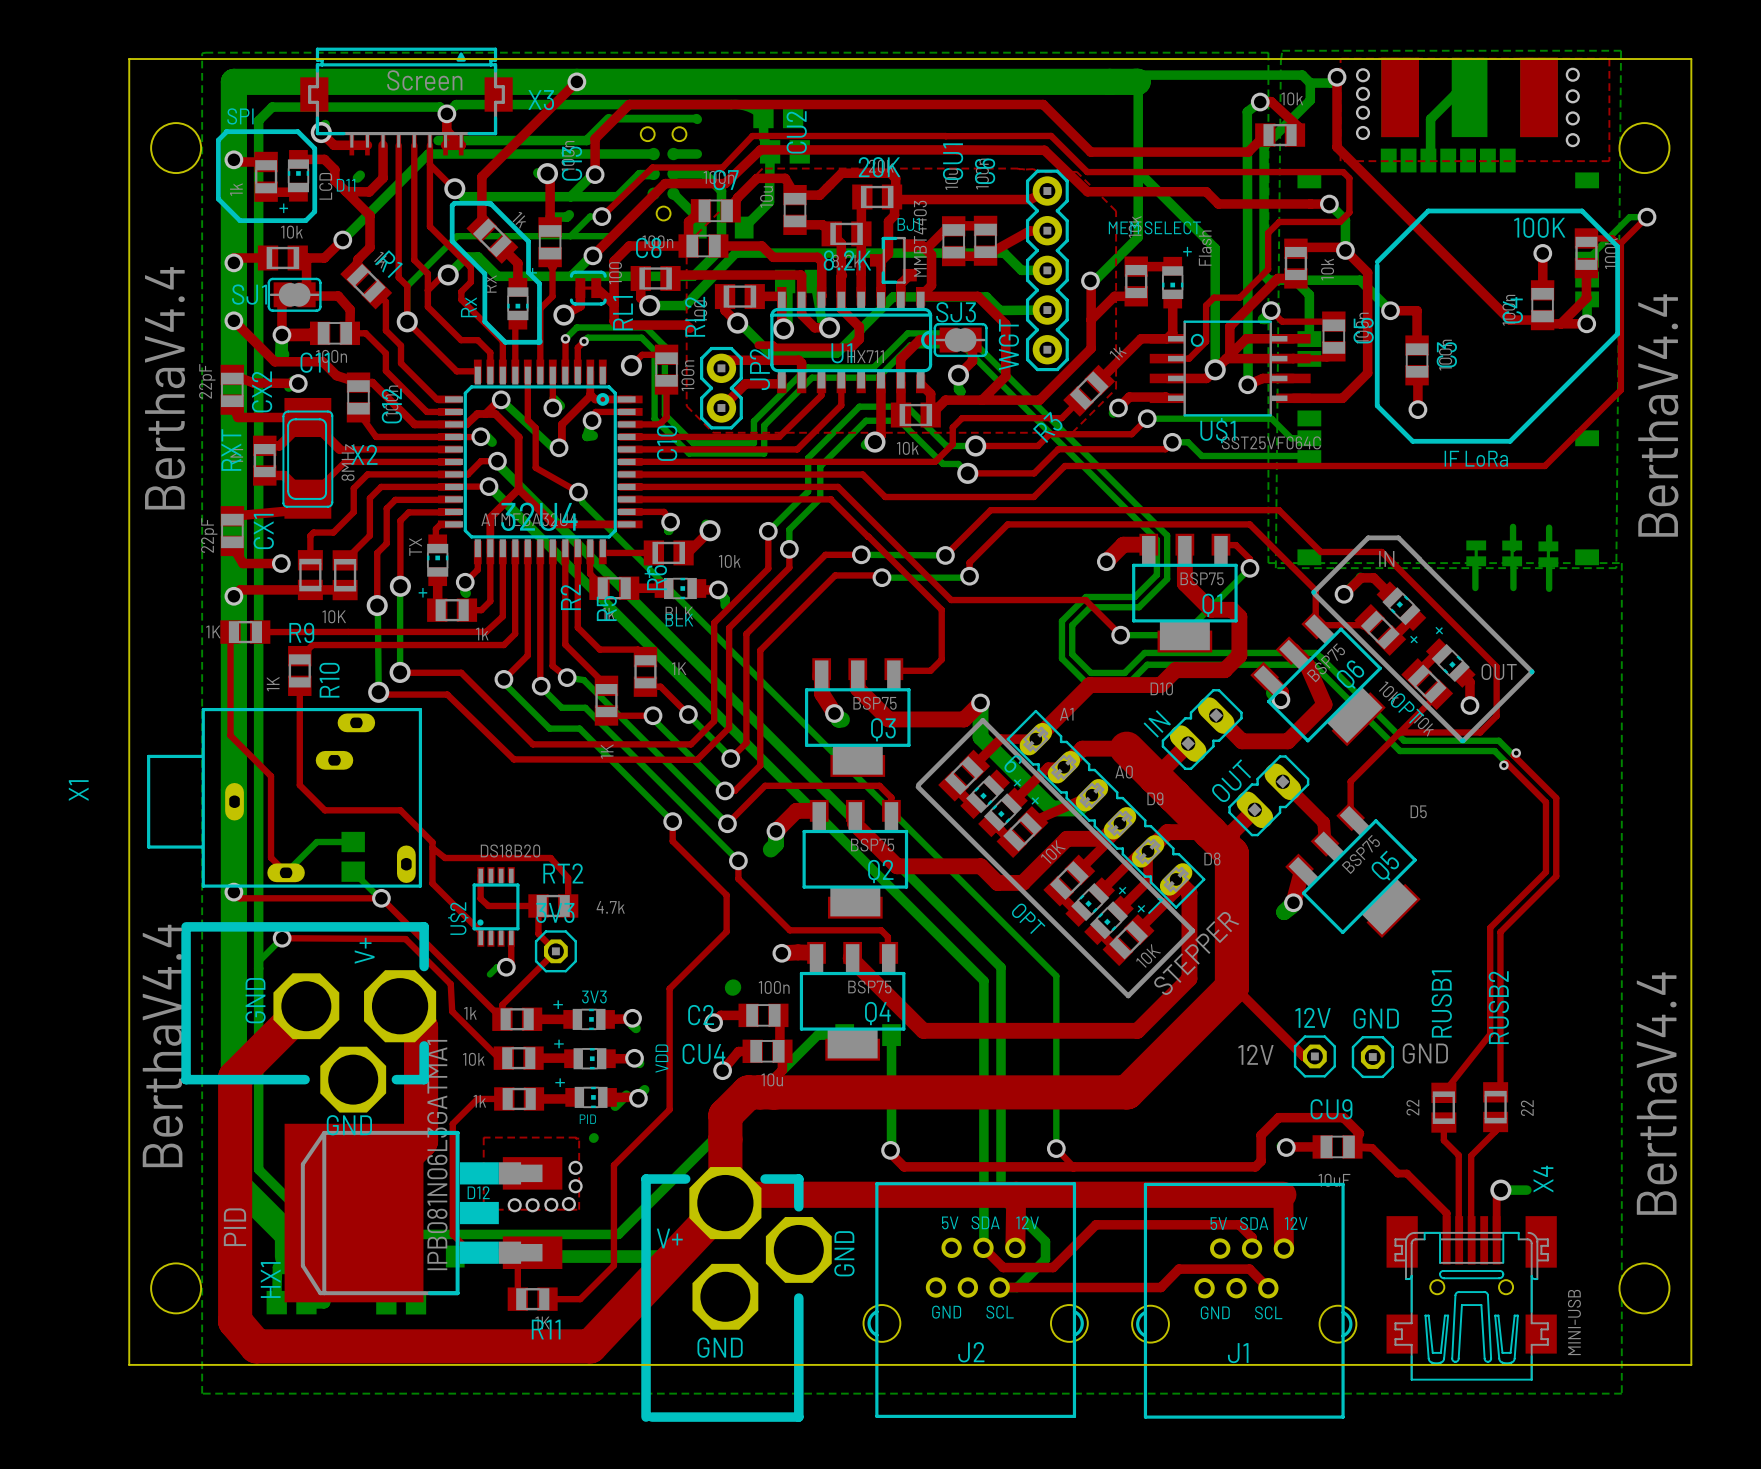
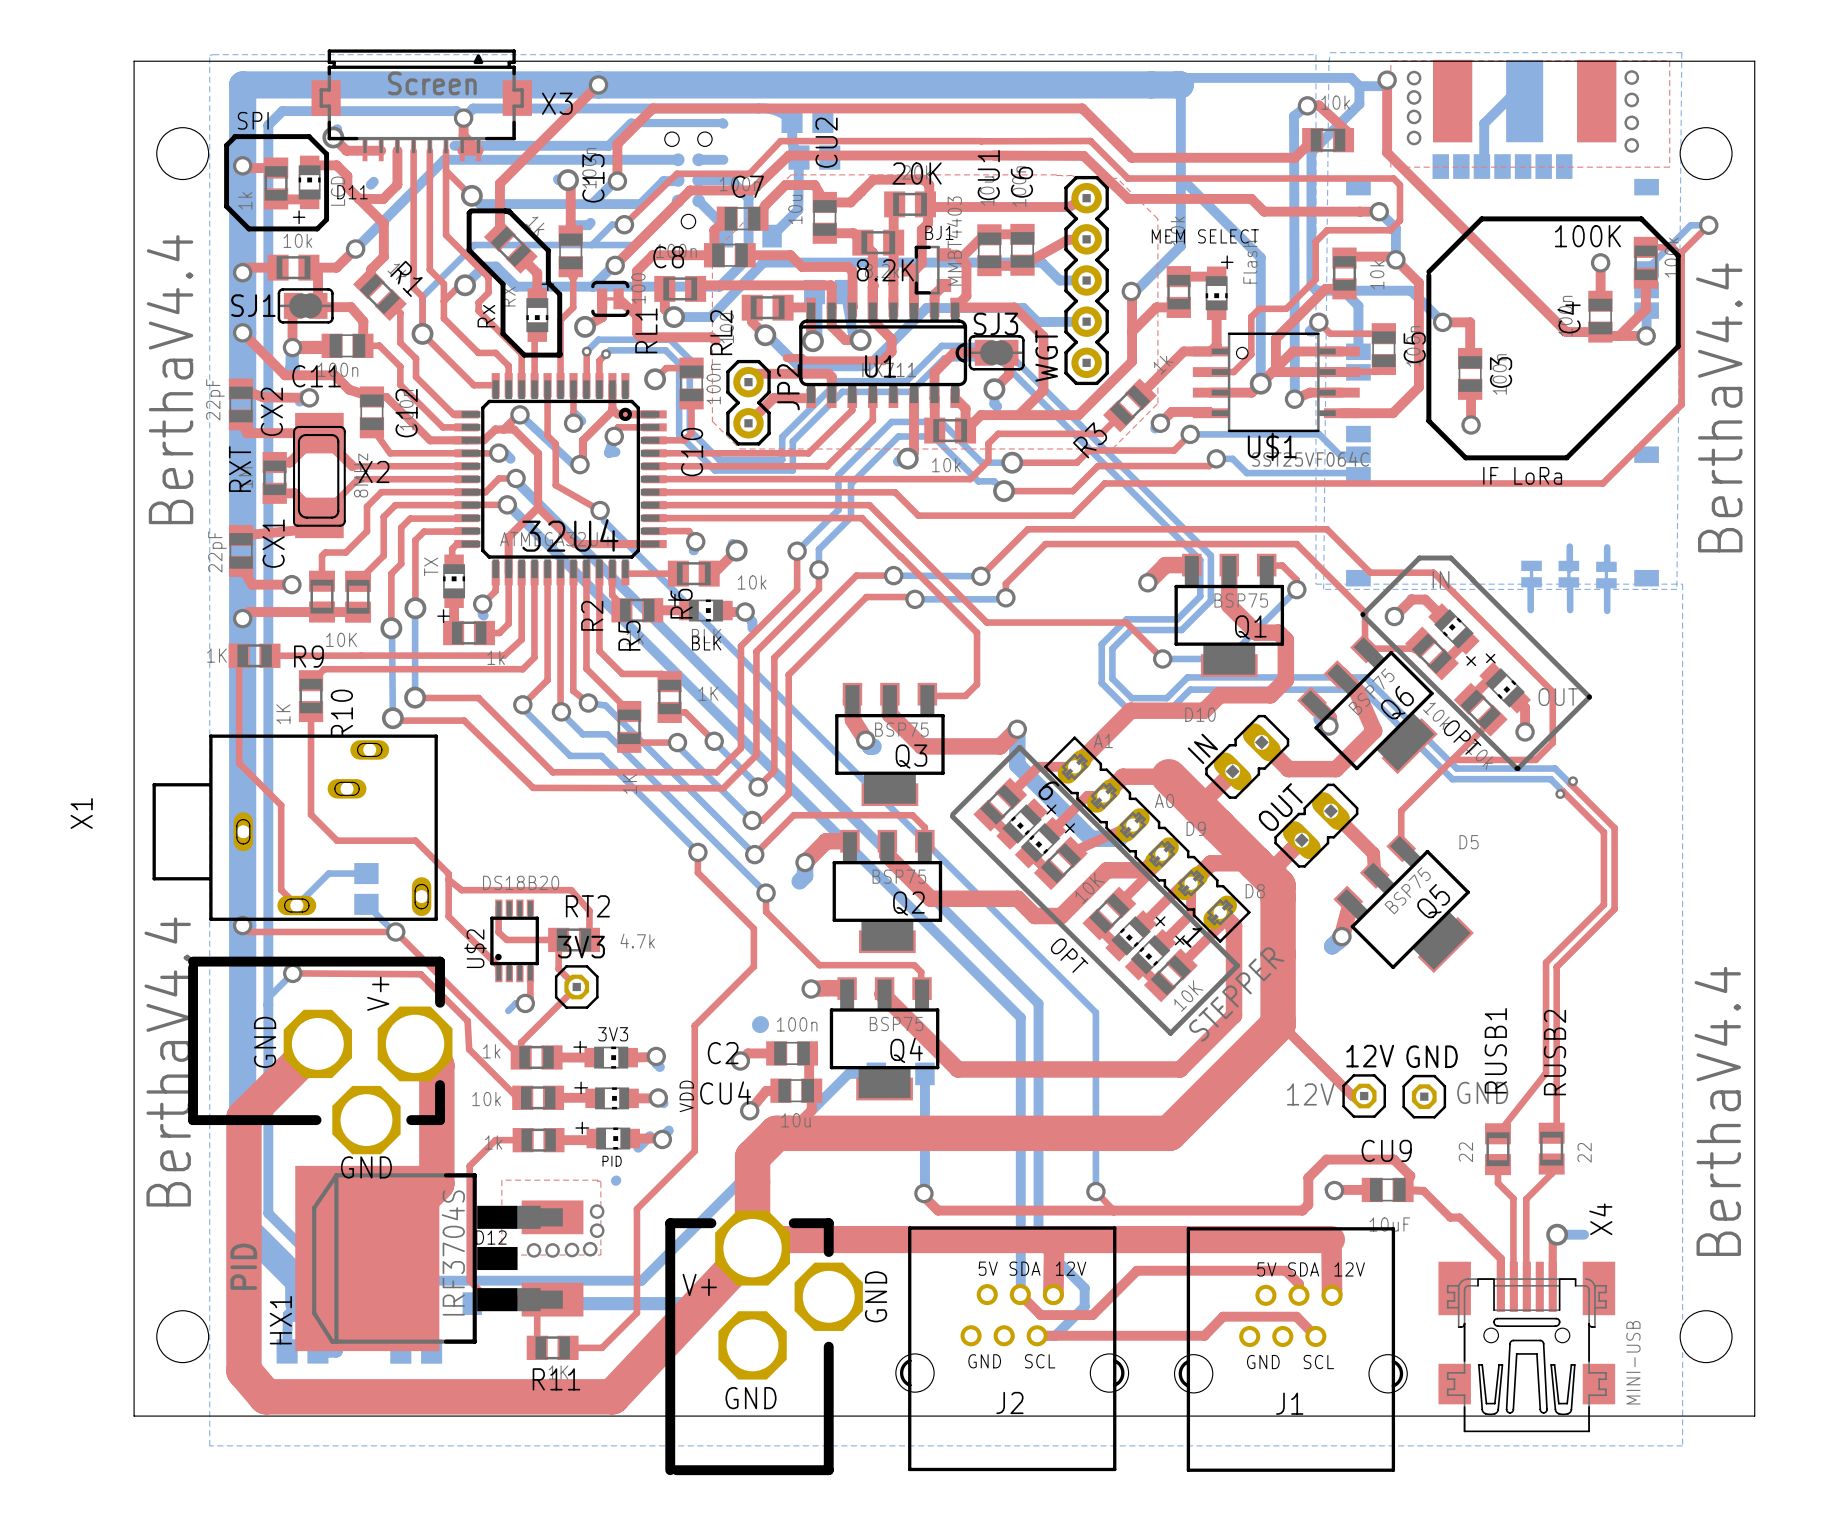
HX1 value: IPB081N06L3GATMA1 (437, 1155) -> IRF3704S (453, 1253)

